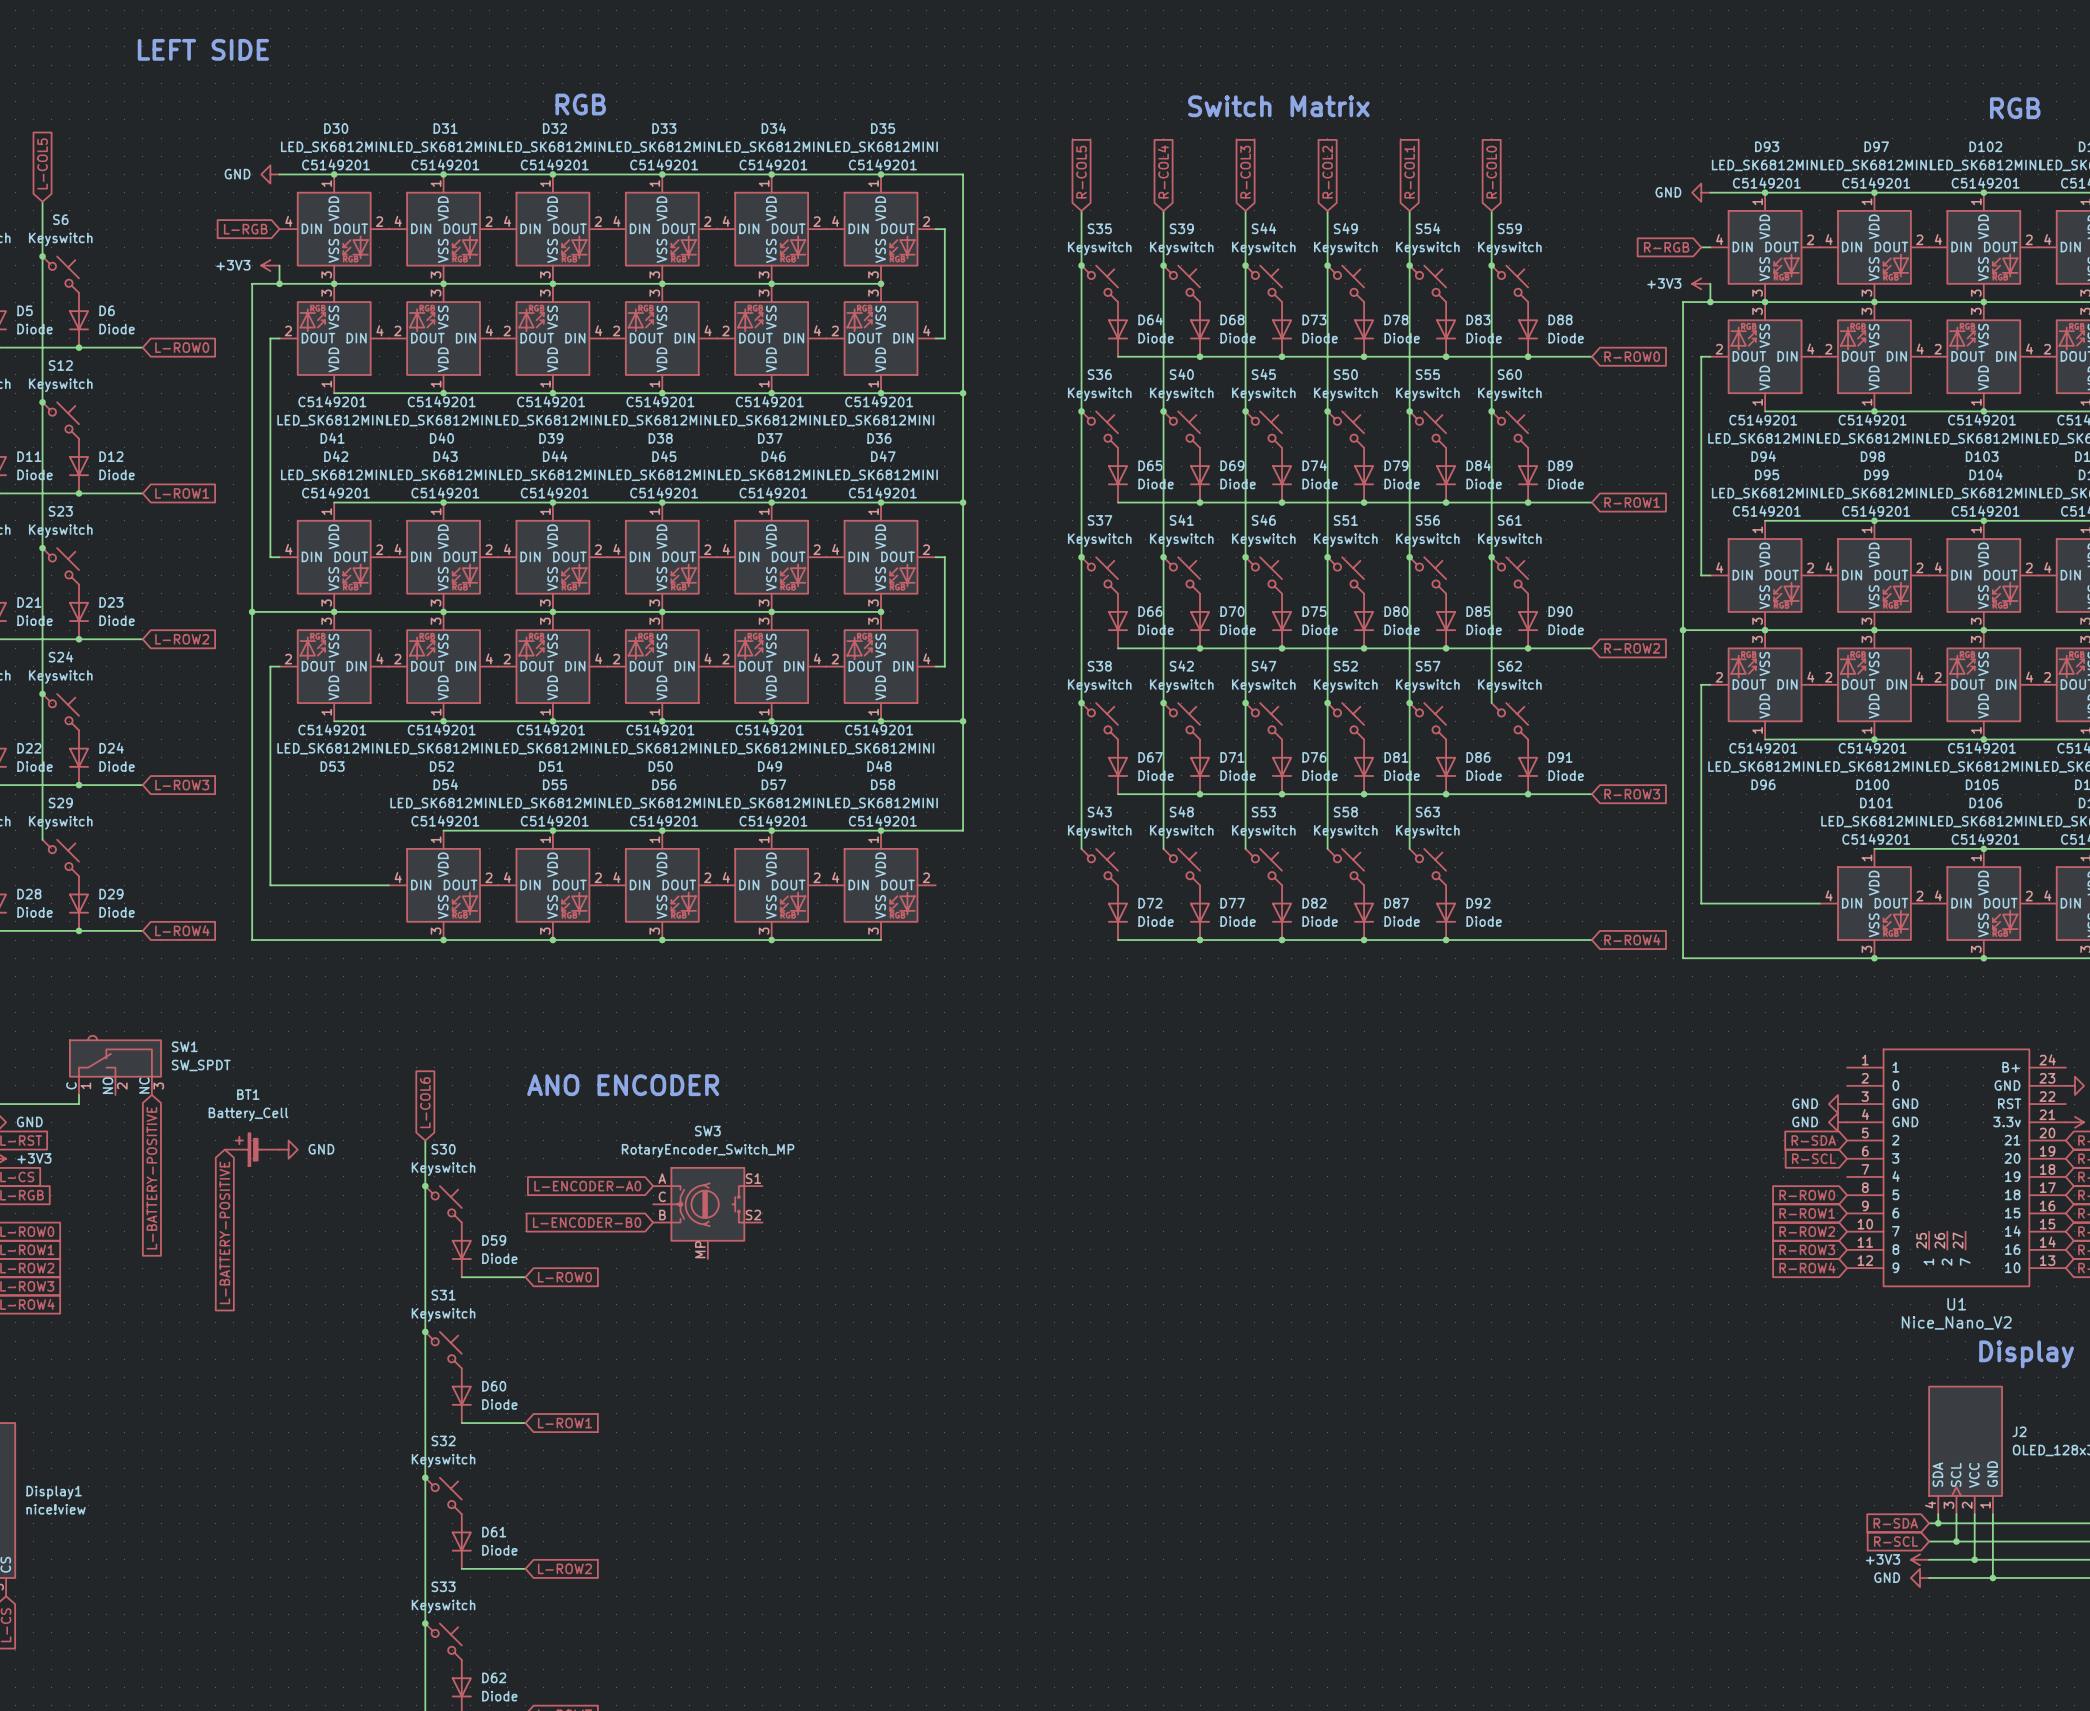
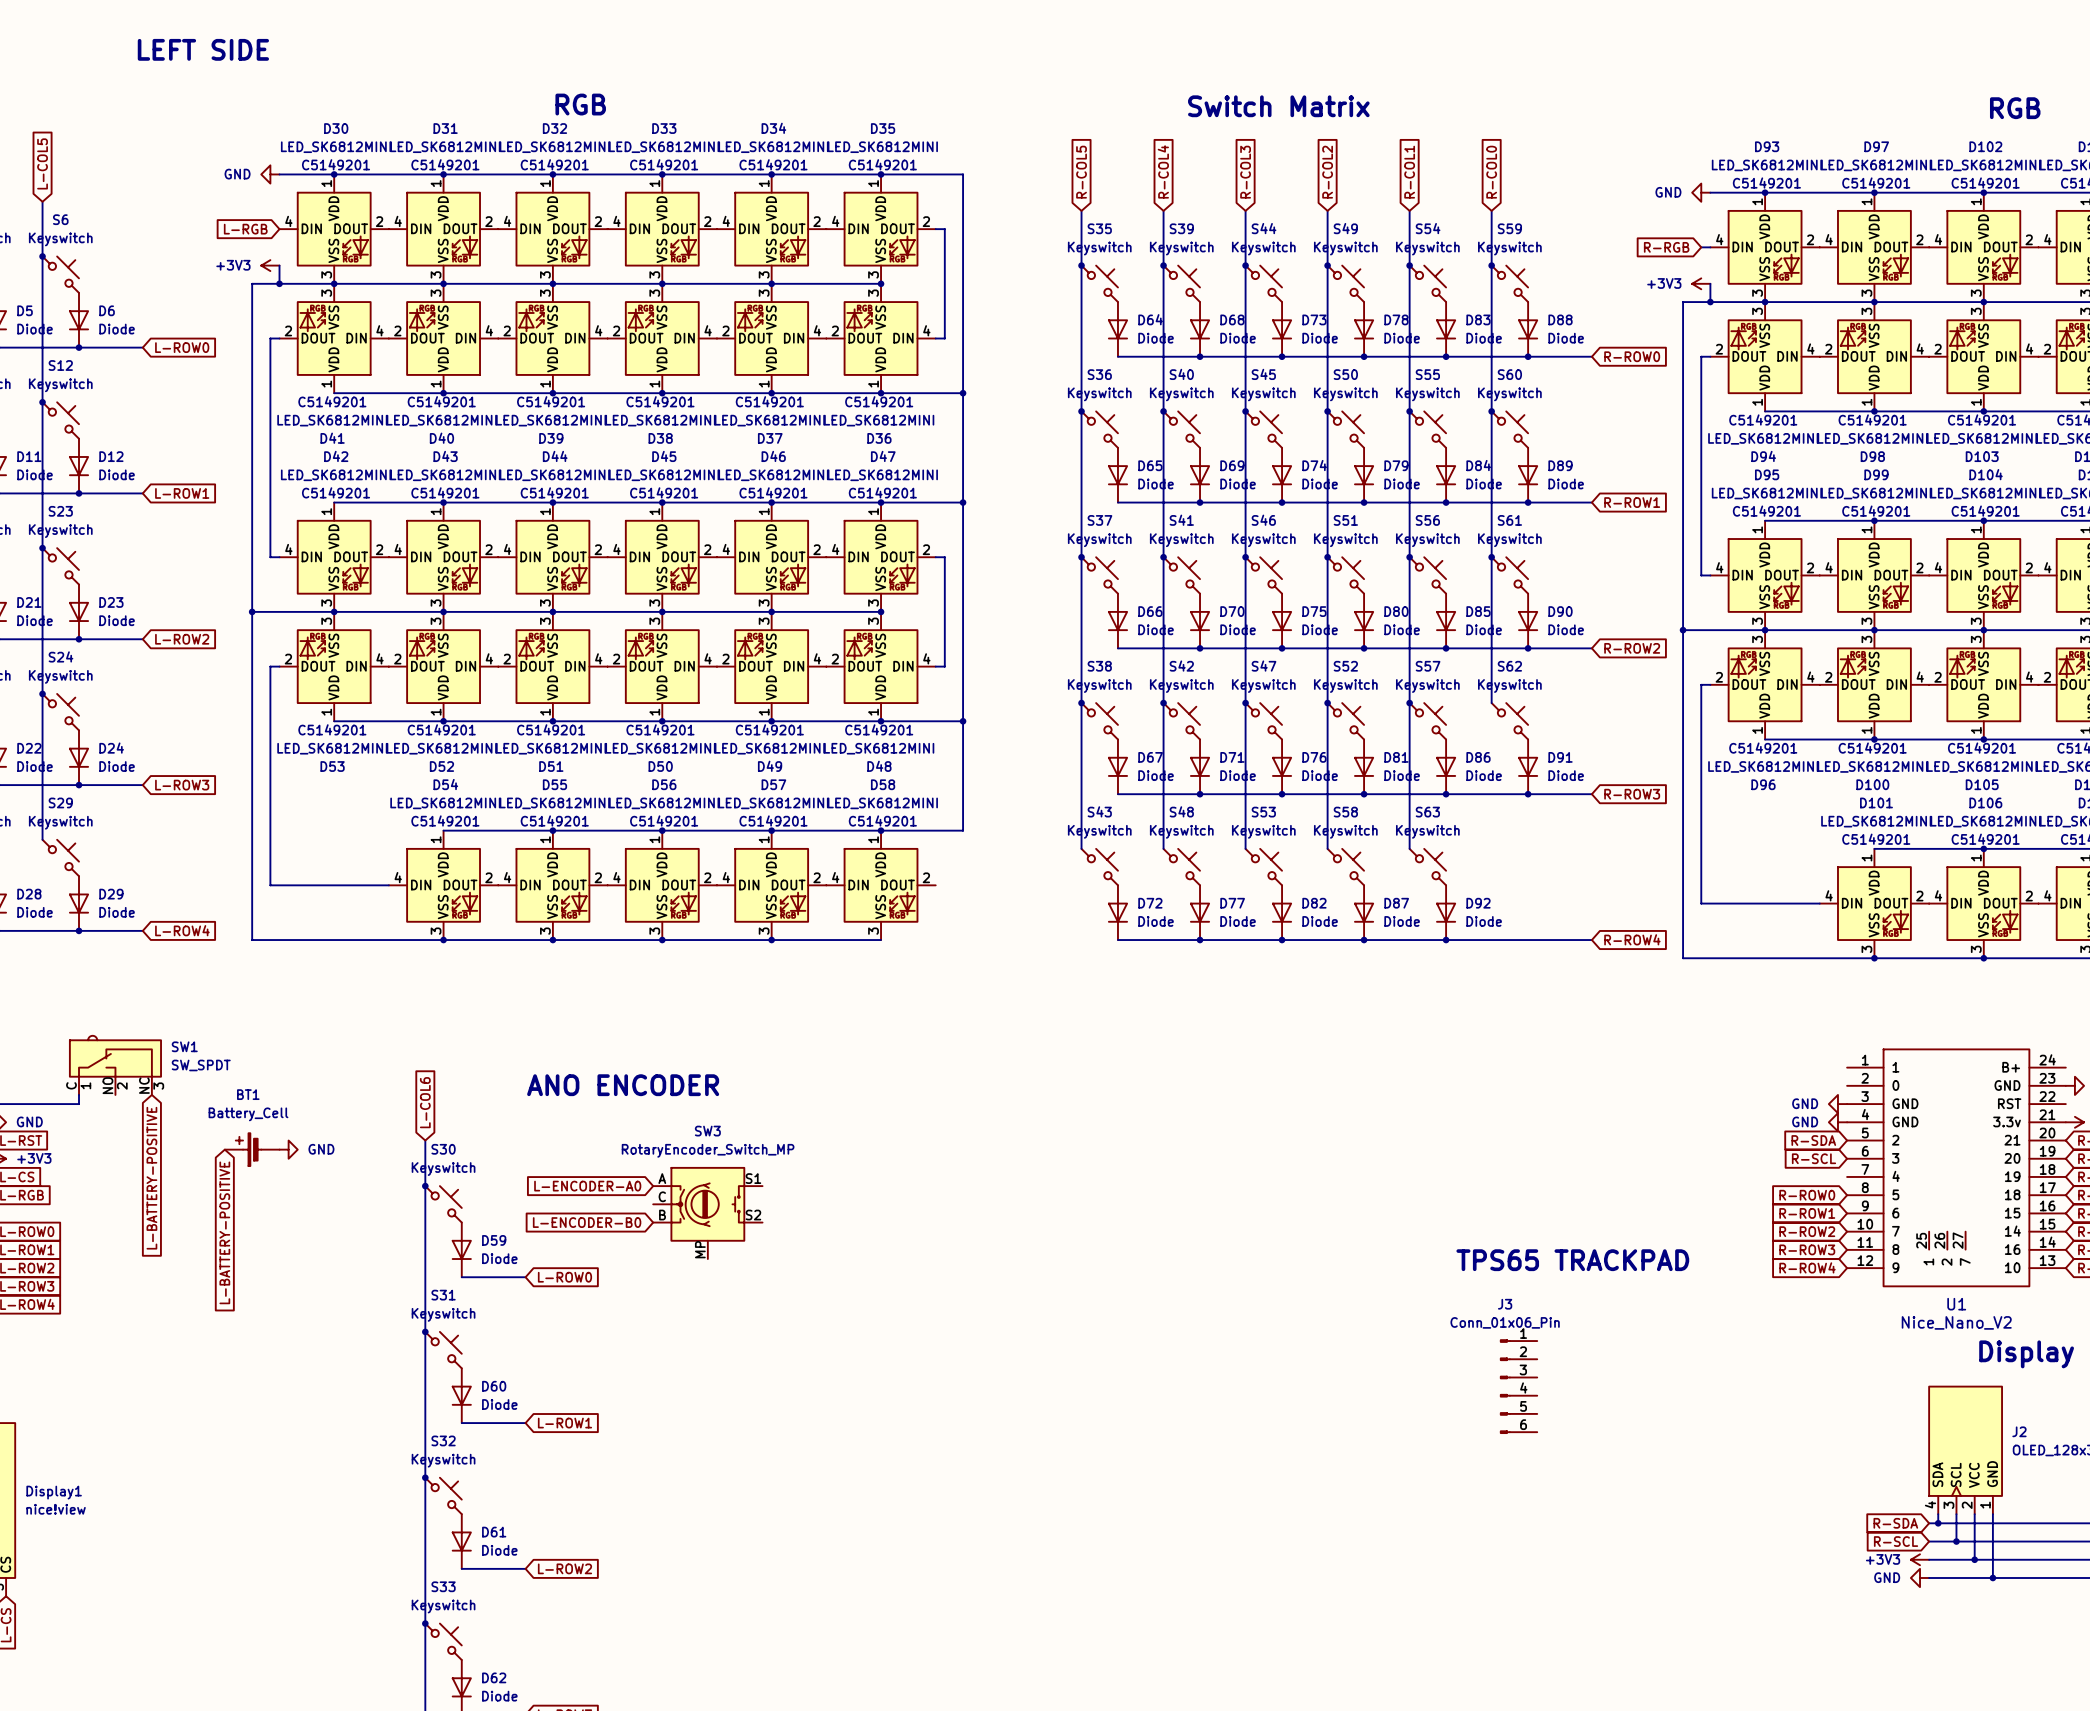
text: none -> TPS65 TRACKPAD (1572, 1260)
J3: none -> Conn_01x06_Pin (1518, 1386)

